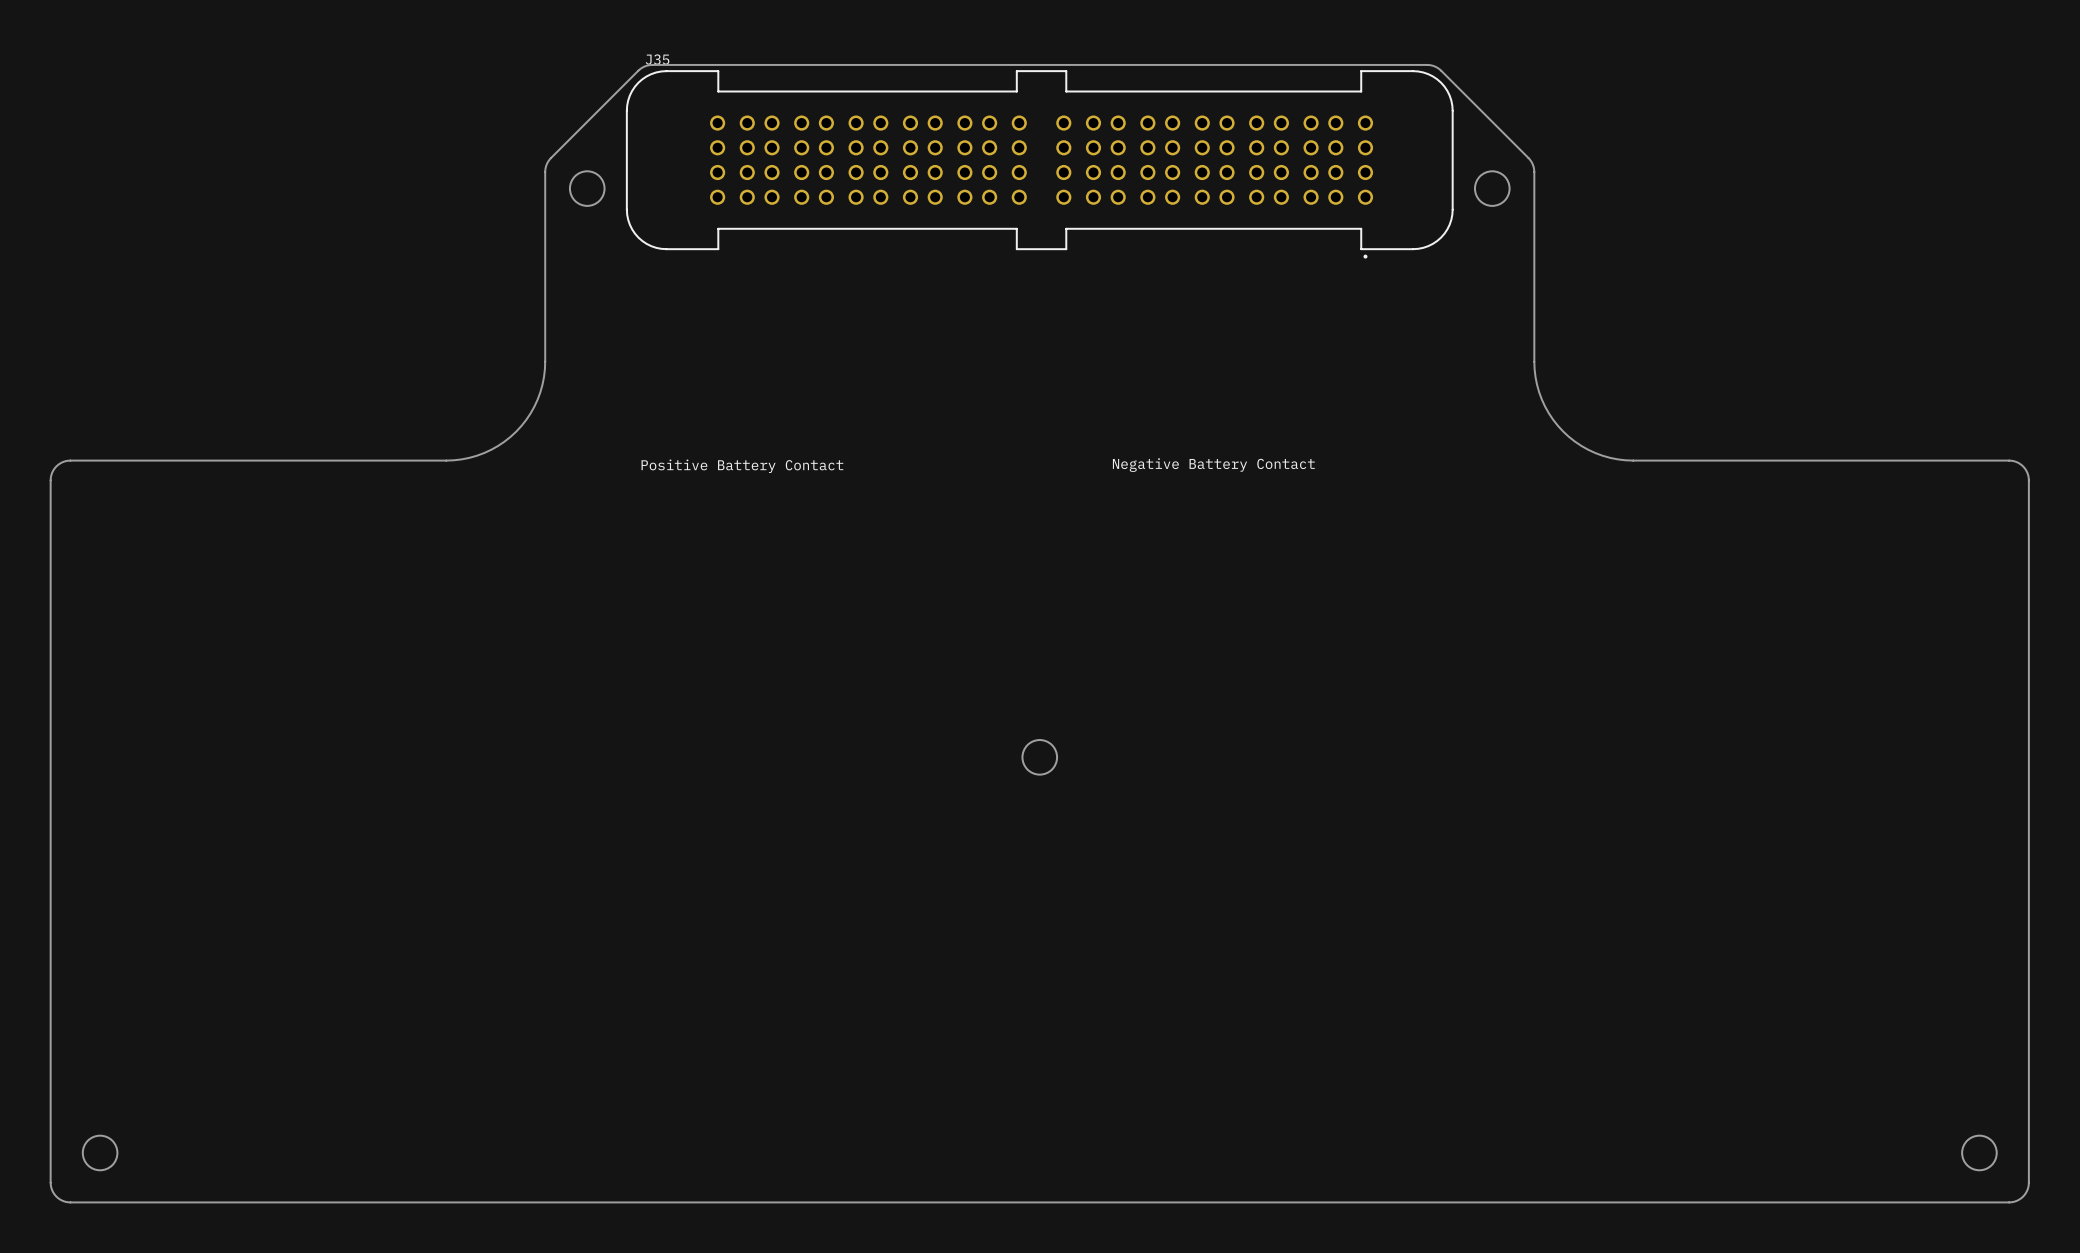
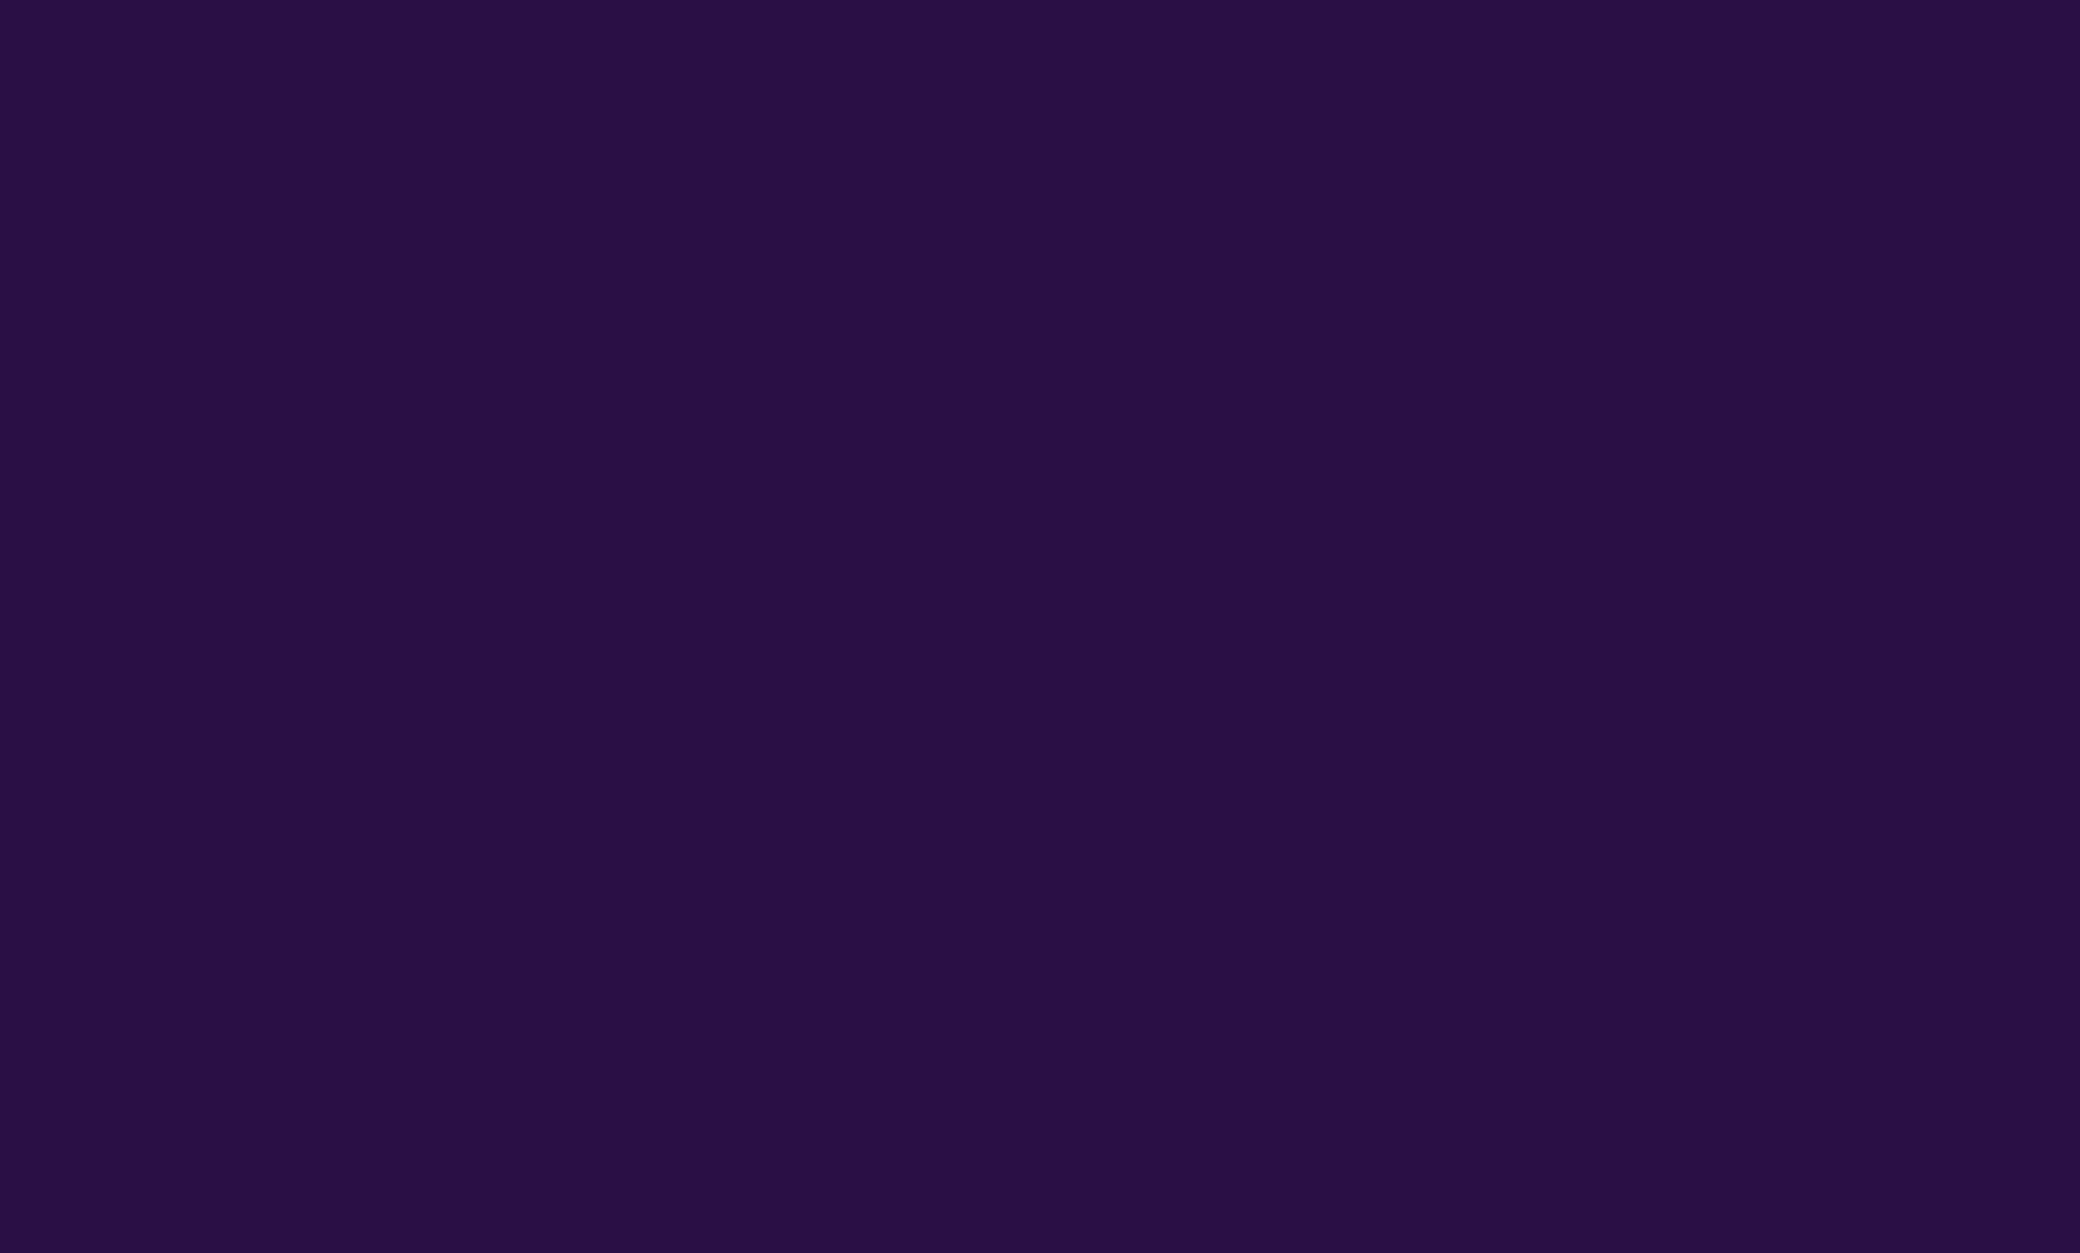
board edge: (652, 64) (1432, 65) (1441, 70) (1532, 164) (1535, 377) (1539, 392) (1548, 413) (1558, 425) (1575, 441) (1602, 455) (1625, 460) (2009, 460) (2021, 464) (2026, 471) (2028, 480) (2028, 1182) (2024, 1194) (2017, 1200) (2009, 1202) (70, 1202) (58, 1198) (52, 1191) (50, 1182) (50, 480) (52, 471) (59, 463) (70, 460) (454, 460) (484, 453) (504, 441) (516, 431) (530, 413) (540, 392) (543, 377) (546, 164) (638, 70) (644, 66) (652, 64) -> none
J35: (1039, 164) -> none
round board edge: [568, 170, 606, 207] -> none
round board edge: [1473, 170, 1511, 207] -> none
text: Negative Battery Contact (1213, 465) -> none
text: Positive Battery Contact (742, 466) -> none
round board edge: [1021, 739, 1059, 776] -> none
round board edge: [81, 1134, 119, 1172] -> none
round board edge: [1961, 1134, 1998, 1172] -> none

